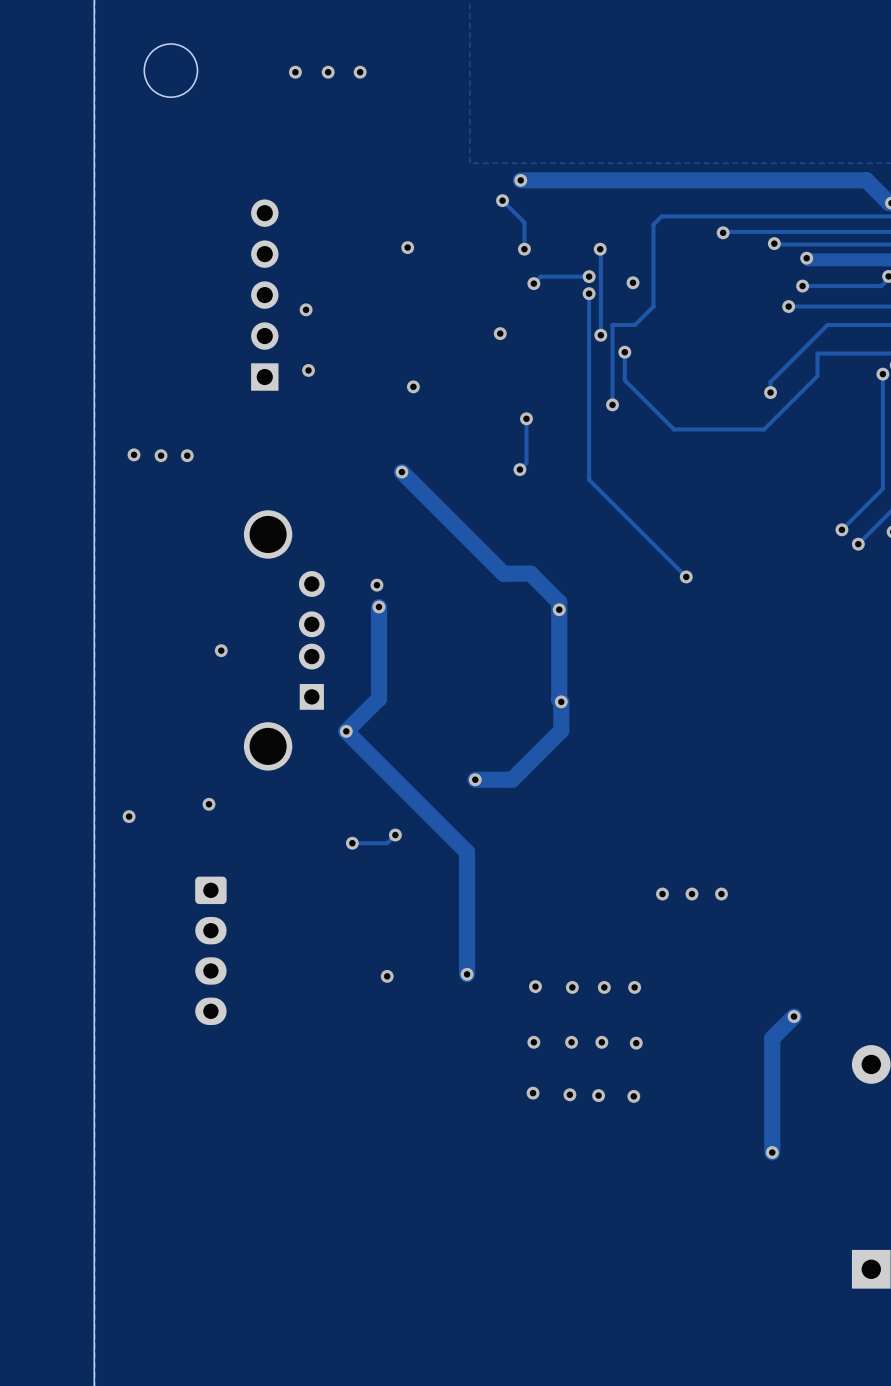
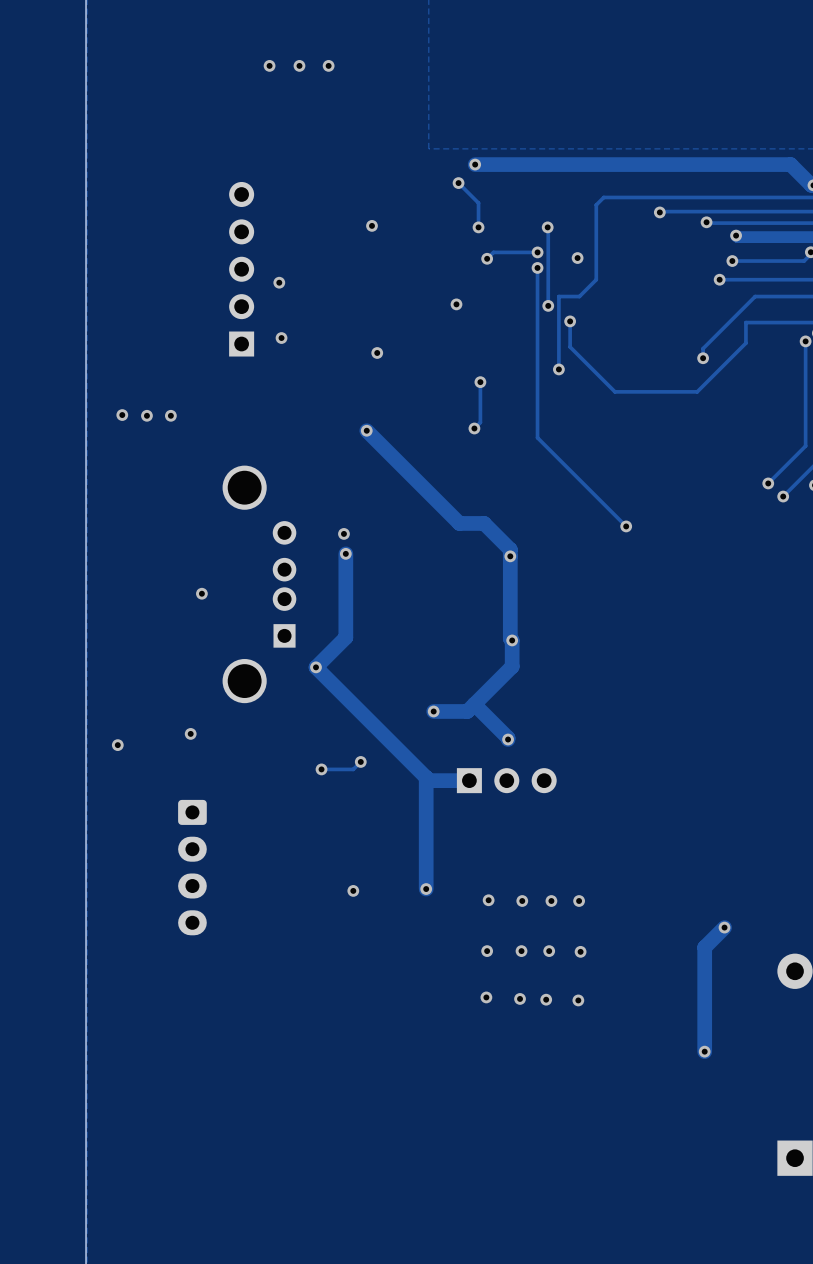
round board edge: [143, 43, 199, 99] -> none
track: none -> (474, 704) (508, 739)
via: none -> (508, 739)
track: none -> (426, 777) (429, 780) (469, 780)
part: none -> (506, 780)
via: (662, 894) -> none
via: (691, 894) -> none
via: (721, 894) -> none

